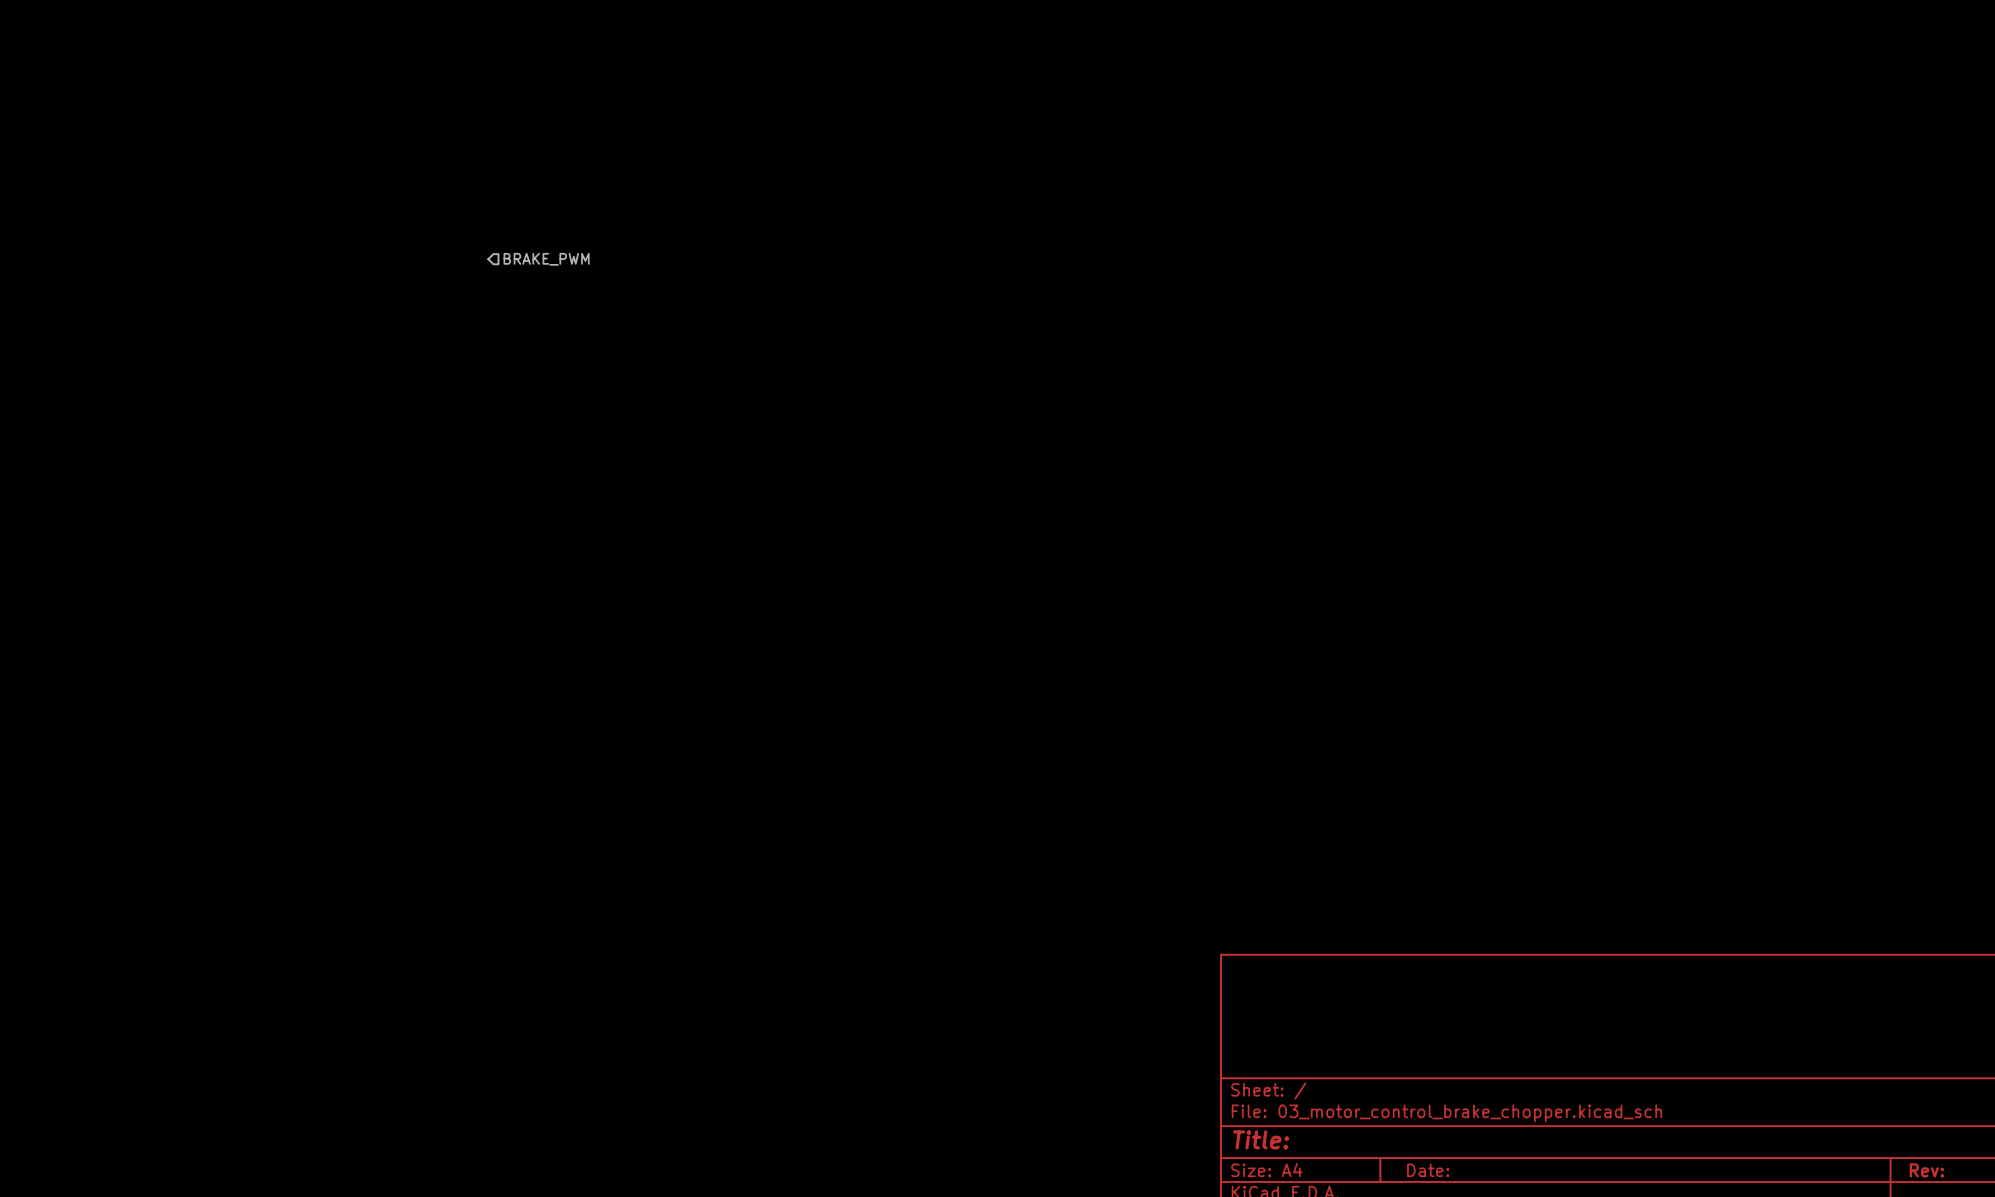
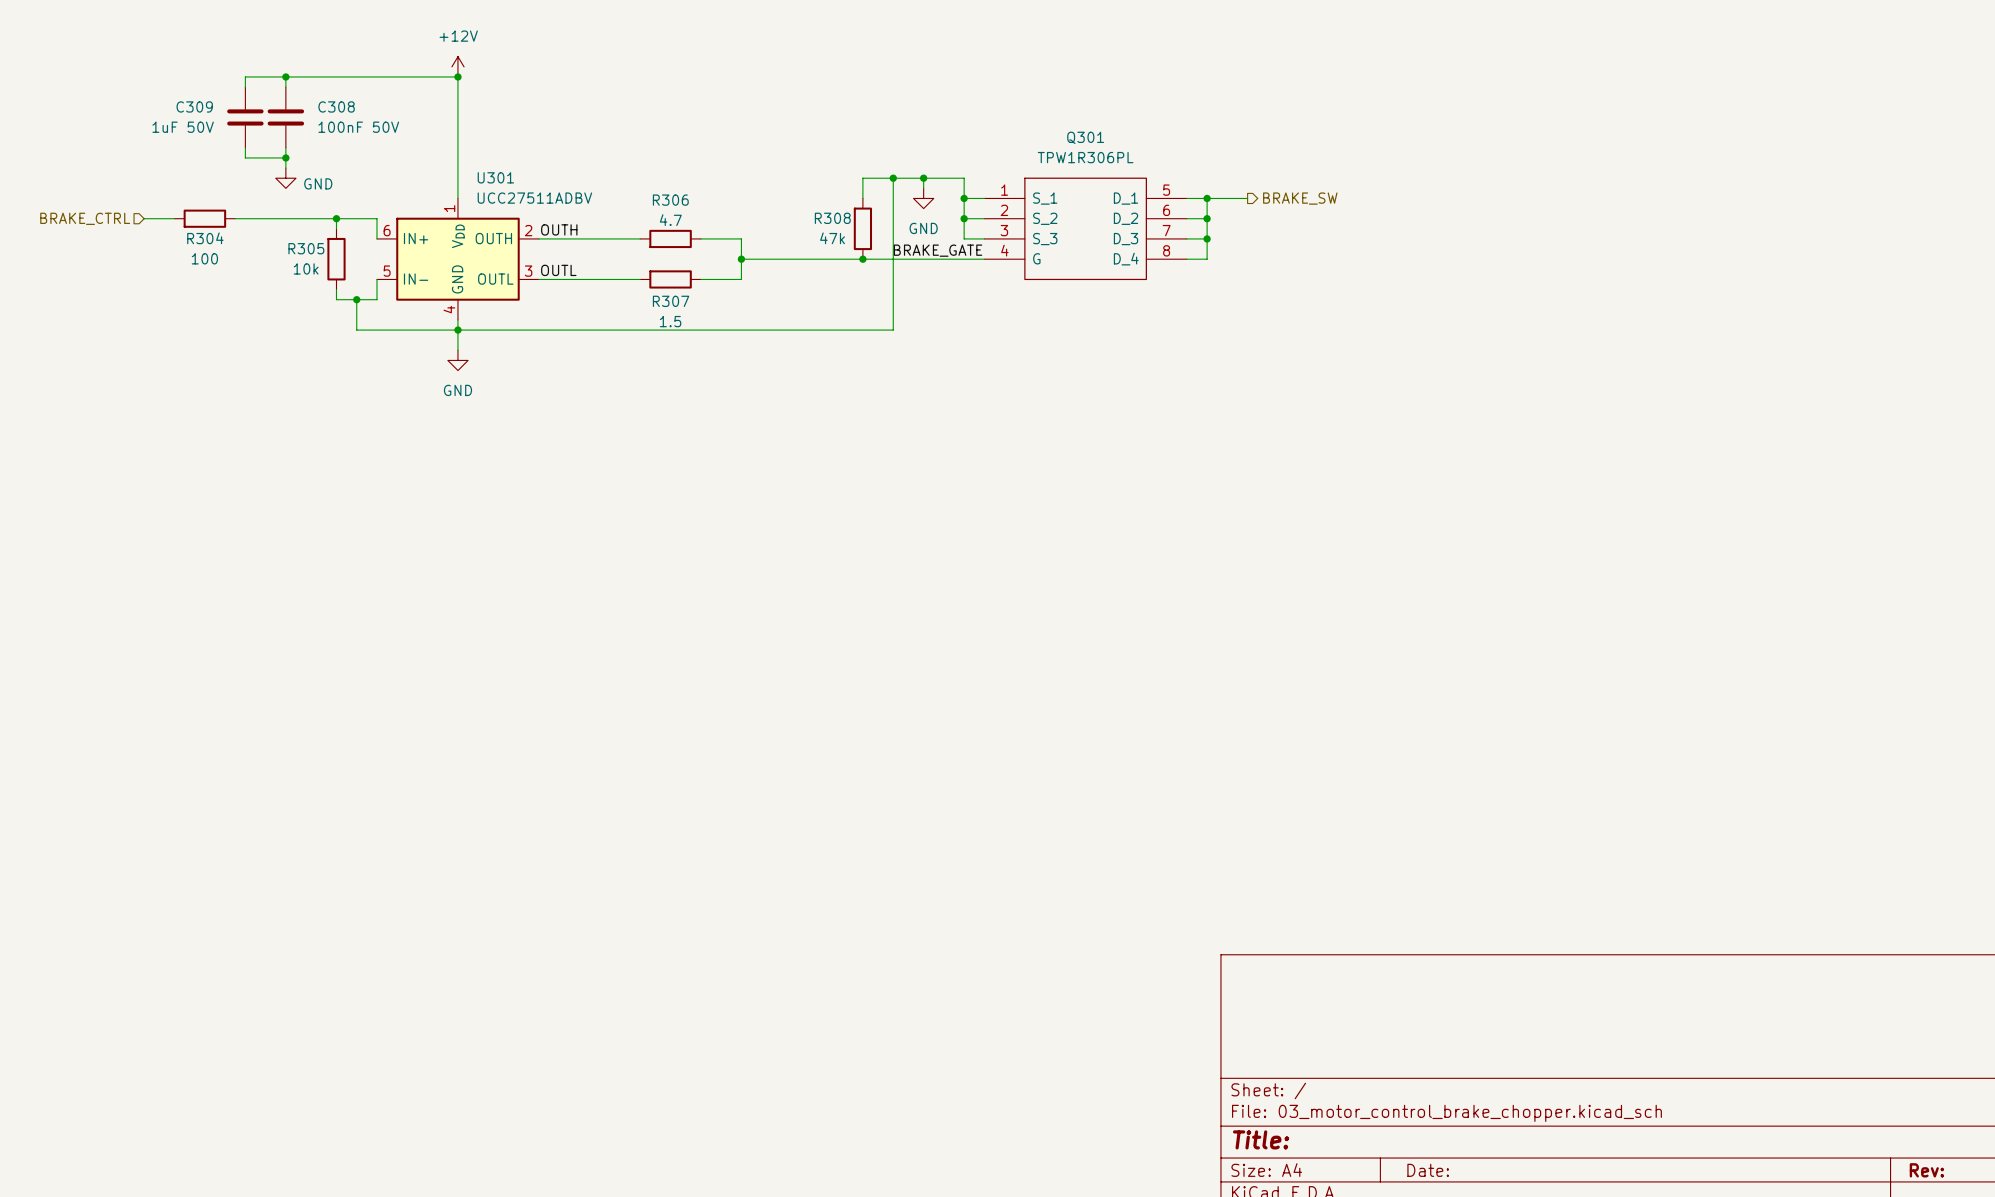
power symbol: none -> +12V (457, 66)
wire: none -> (285, 76) (285, 87)
junction: none -> (285, 76)
junction: none -> (457, 76)
wire: none -> (245, 87) (245, 76) (457, 76) (457, 198)
C309: none -> 1uF 50V (245, 117)
C308: none -> 100nF 50V (285, 117)
wire: none -> (245, 147) (245, 157) (285, 157)
wire: none -> (285, 147) (285, 168)
junction: none -> (285, 157)
power symbol: none -> GND (285, 178)
wire: none -> (893, 178) (893, 330) (356, 330) (356, 299)
junction: none -> (893, 178)
wire: none -> (923, 178) (923, 188)
junction: none -> (923, 178)
wire: none -> (862, 198) (862, 178) (964, 178) (964, 238) (984, 238)
power symbol: none -> GND (923, 198)
wire: none -> (964, 198) (984, 198)
junction: none -> (964, 198)
wire: none -> (1186, 198) (1247, 198)
wire: none -> (1207, 198) (1207, 259) (1186, 259)
junction: none -> (1207, 198)
hierarchical label: none -> BRAKE_SW (1300, 198)
hierarchical label: none -> BRAKE_CTRL (85, 218)
wire: none -> (144, 218) (174, 218)
R304: none -> 100 (204, 218)
wire: none -> (235, 218) (376, 218) (376, 238)
wire: none -> (336, 218) (336, 228)
junction: none -> (336, 218)
wire: none -> (964, 218) (984, 218)
junction: none -> (964, 218)
wire: none -> (1186, 218) (1207, 218)
junction: none -> (1207, 218)
R308: none -> 47k (862, 228)
Q301: none -> TPW1R306PL (1085, 228)
label: none -> OUTH (559, 229)
wire: none -> (538, 238) (640, 238)
R306: none -> 4.7 (670, 238)
wire: none -> (700, 238) (741, 238) (741, 279) (700, 279)
wire: none -> (1186, 238) (1207, 238)
junction: none -> (1207, 238)
label: none -> BRAKE_GATE (938, 250)
R305: none -> 10k (336, 259)
U301: none -> UCC27511ADBV (457, 259)
hierarchical label: BRAKE_PWM (546, 259) -> none
wire: none -> (741, 259) (984, 259)
junction: none -> (741, 259)
junction: none -> (862, 259)
label: none -> OUTL (558, 270)
wire: none -> (376, 279) (376, 299) (336, 299) (336, 289)
wire: none -> (538, 279) (640, 279)
R307: none -> 1.5 (670, 279)
junction: none -> (356, 299)
wire: none -> (457, 319) (457, 350)
junction: none -> (457, 330)
power symbol: none -> GND (457, 360)

